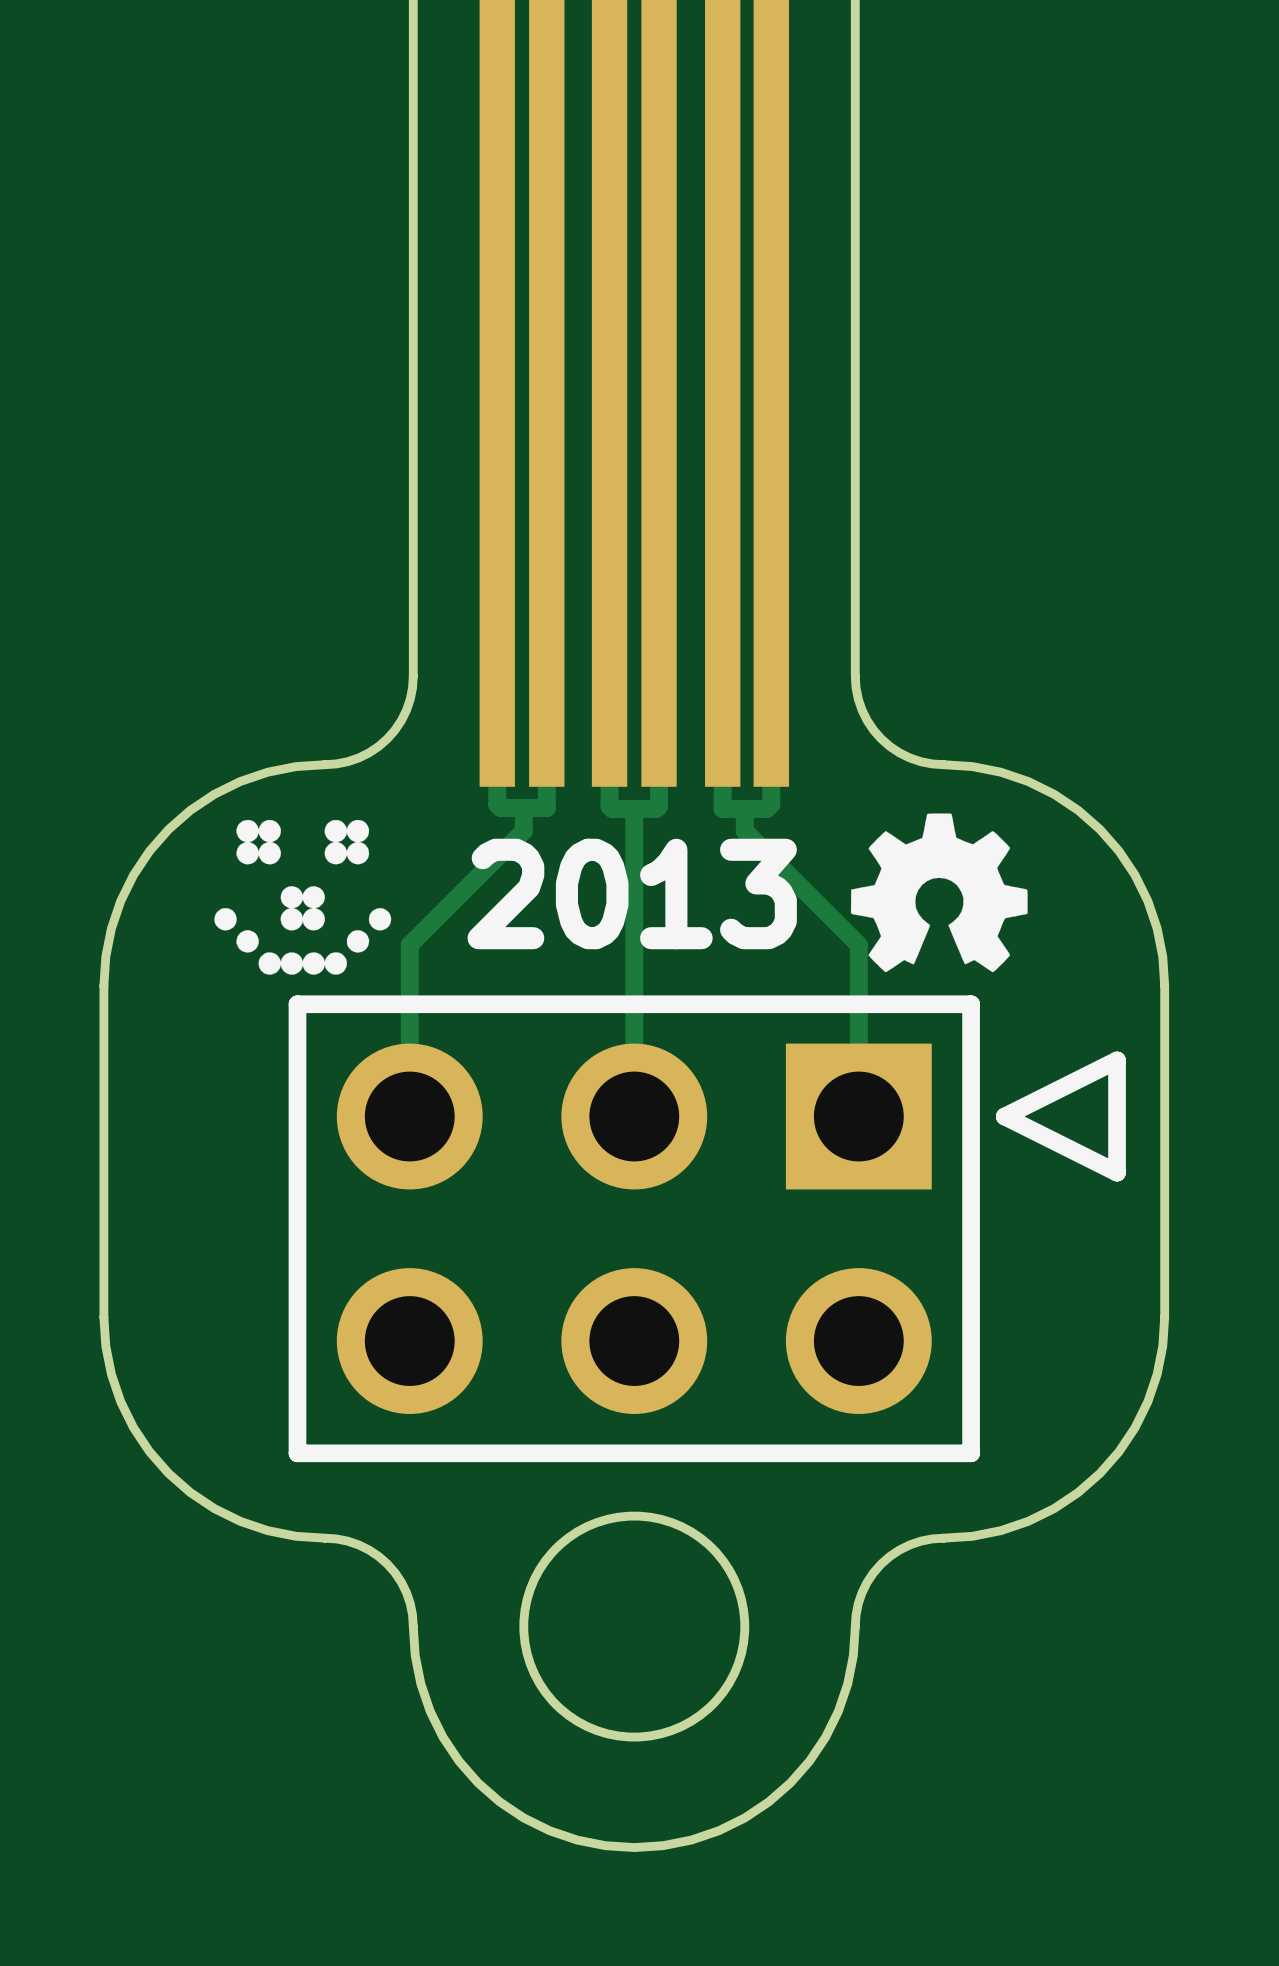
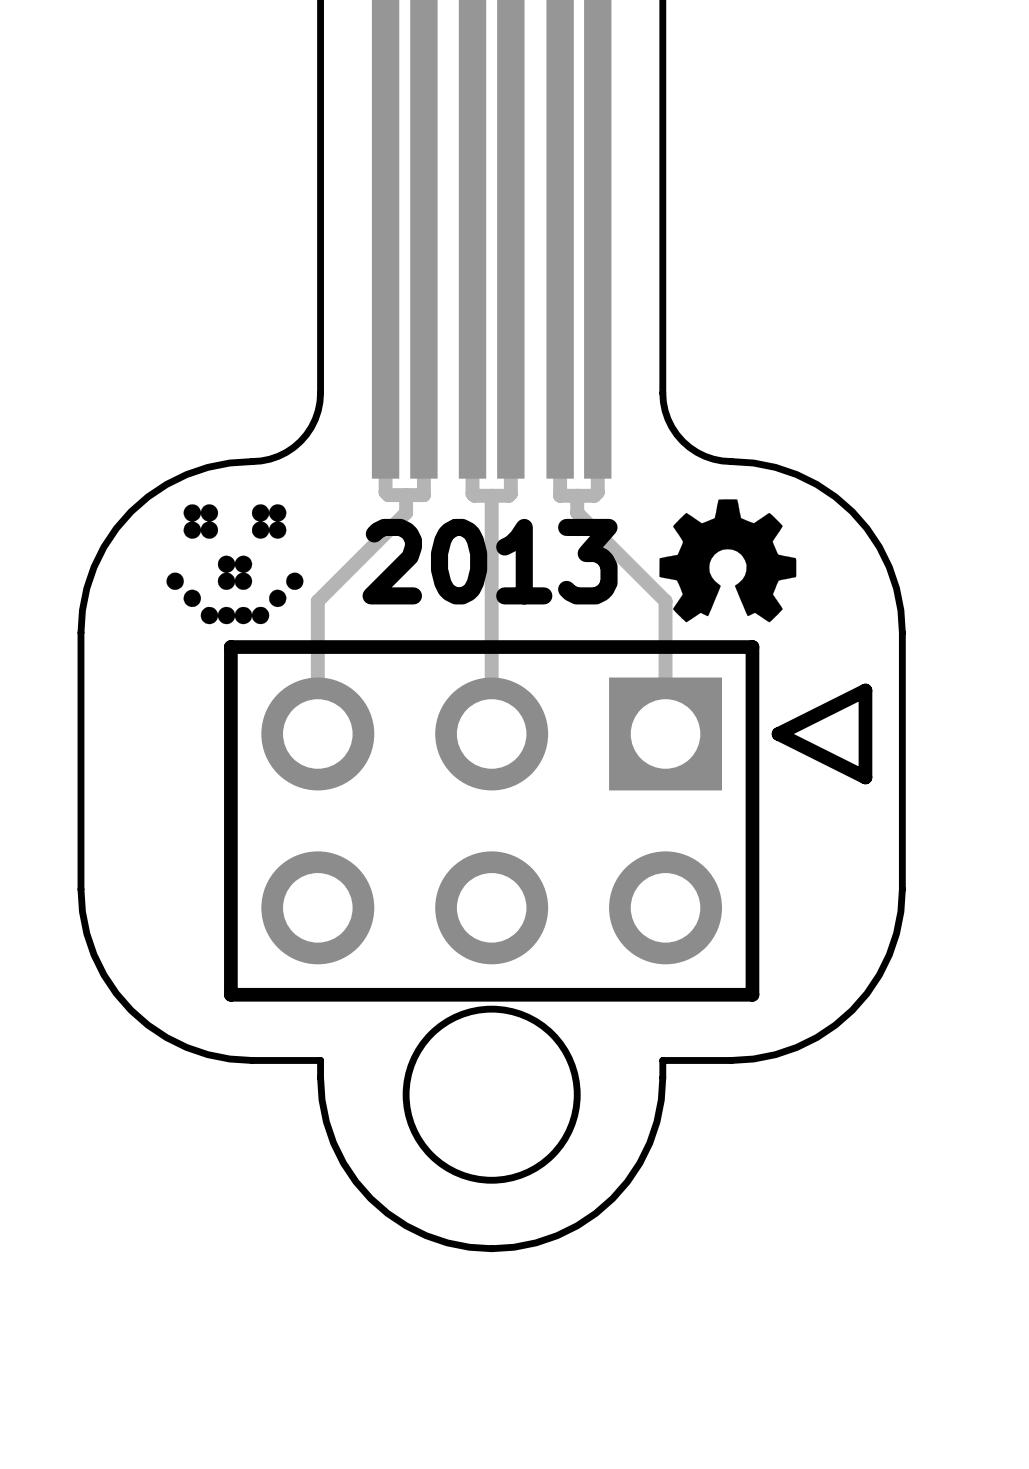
board edge: (324, 1538) (347, 1541) (369, 1550) (387, 1564) (401, 1582) (410, 1603) (415, 1655) (420, 1683) (430, 1711) (442, 1737) (458, 1761) (478, 1782) (499, 1801) (523, 1817) (549, 1830) (577, 1840) (605, 1845) (634, 1847) (663, 1845) (691, 1840) (718, 1830) (744, 1817) (768, 1801) (790, 1782) (809, 1761) (825, 1737) (838, 1711) (847, 1683) (853, 1655) (858, 1603) (867, 1582) (881, 1564) (899, 1550) (920, 1541) (943, 1538) -> (252, 1060) (320, 1060) (322, 1099) (333, 1143) (355, 1181) (370, 1198) (387, 1213) (426, 1235) (469, 1247) (491, 1248) (514, 1247) (557, 1235) (595, 1213) (612, 1198) (627, 1181) (649, 1143) (661, 1099) (662, 1060) (731, 1060)
round board edge position: (634, 1626) -> (491, 1094)

